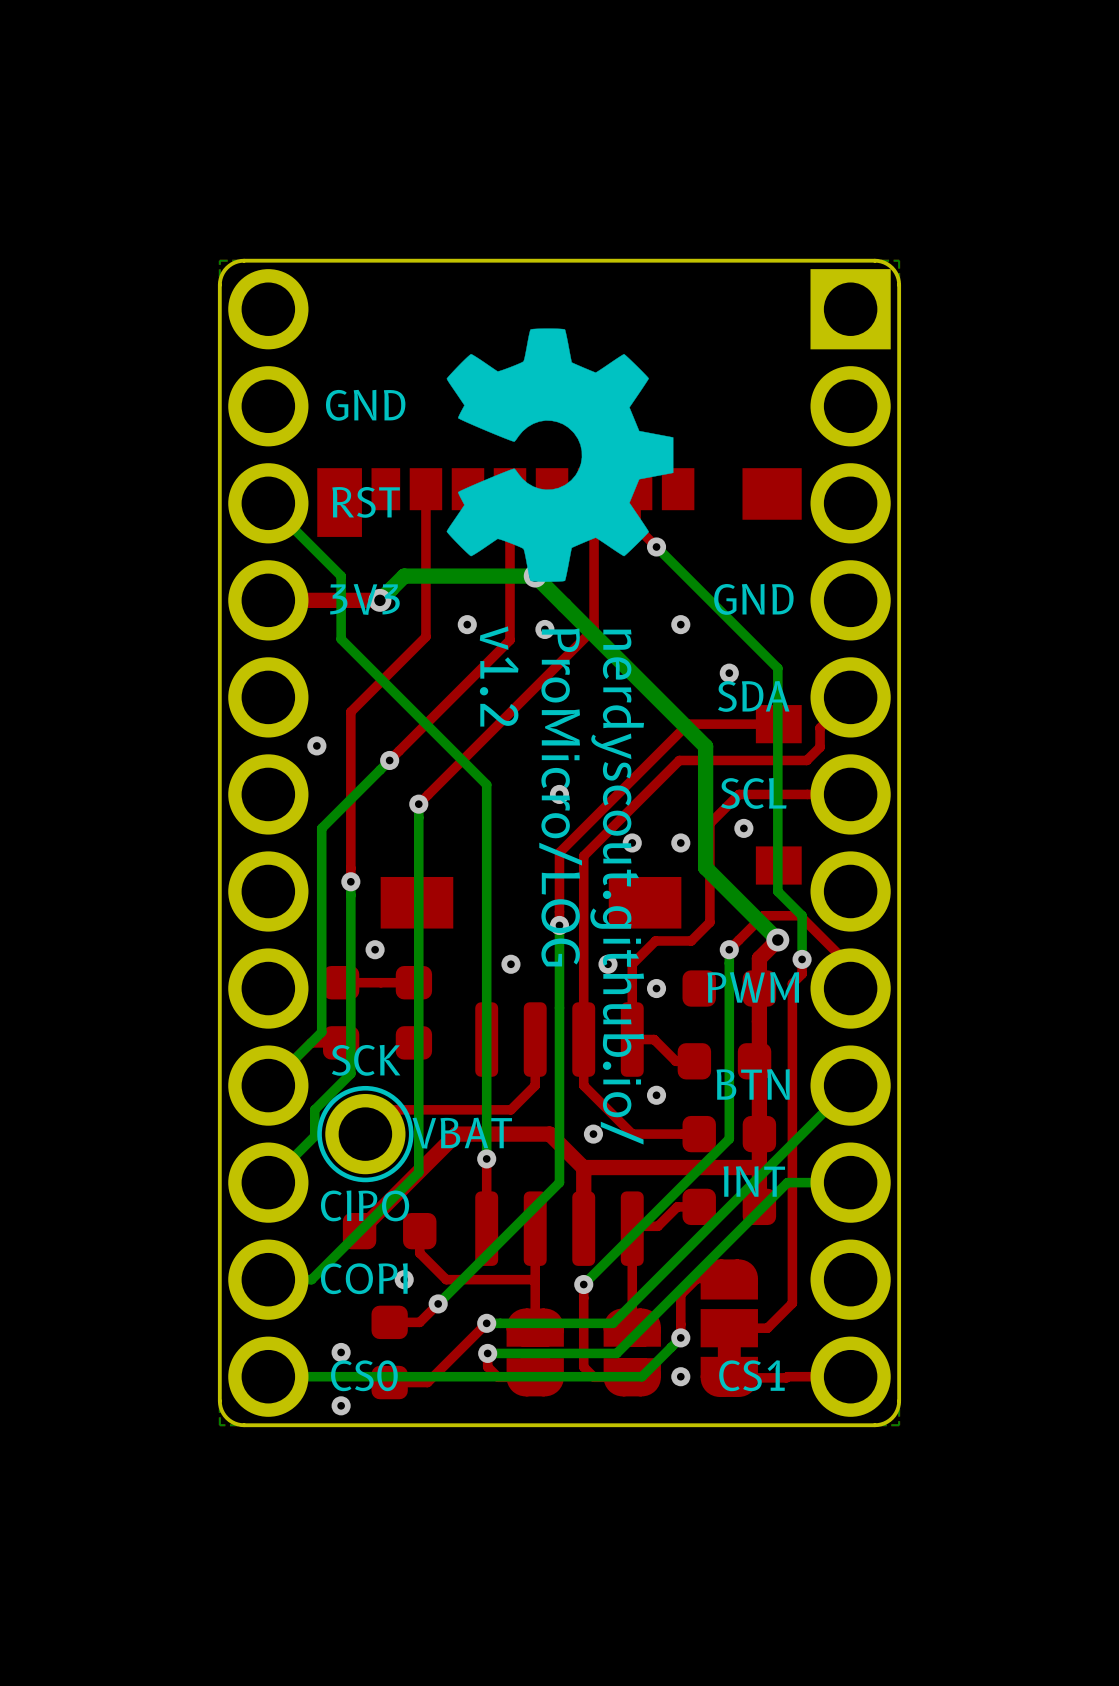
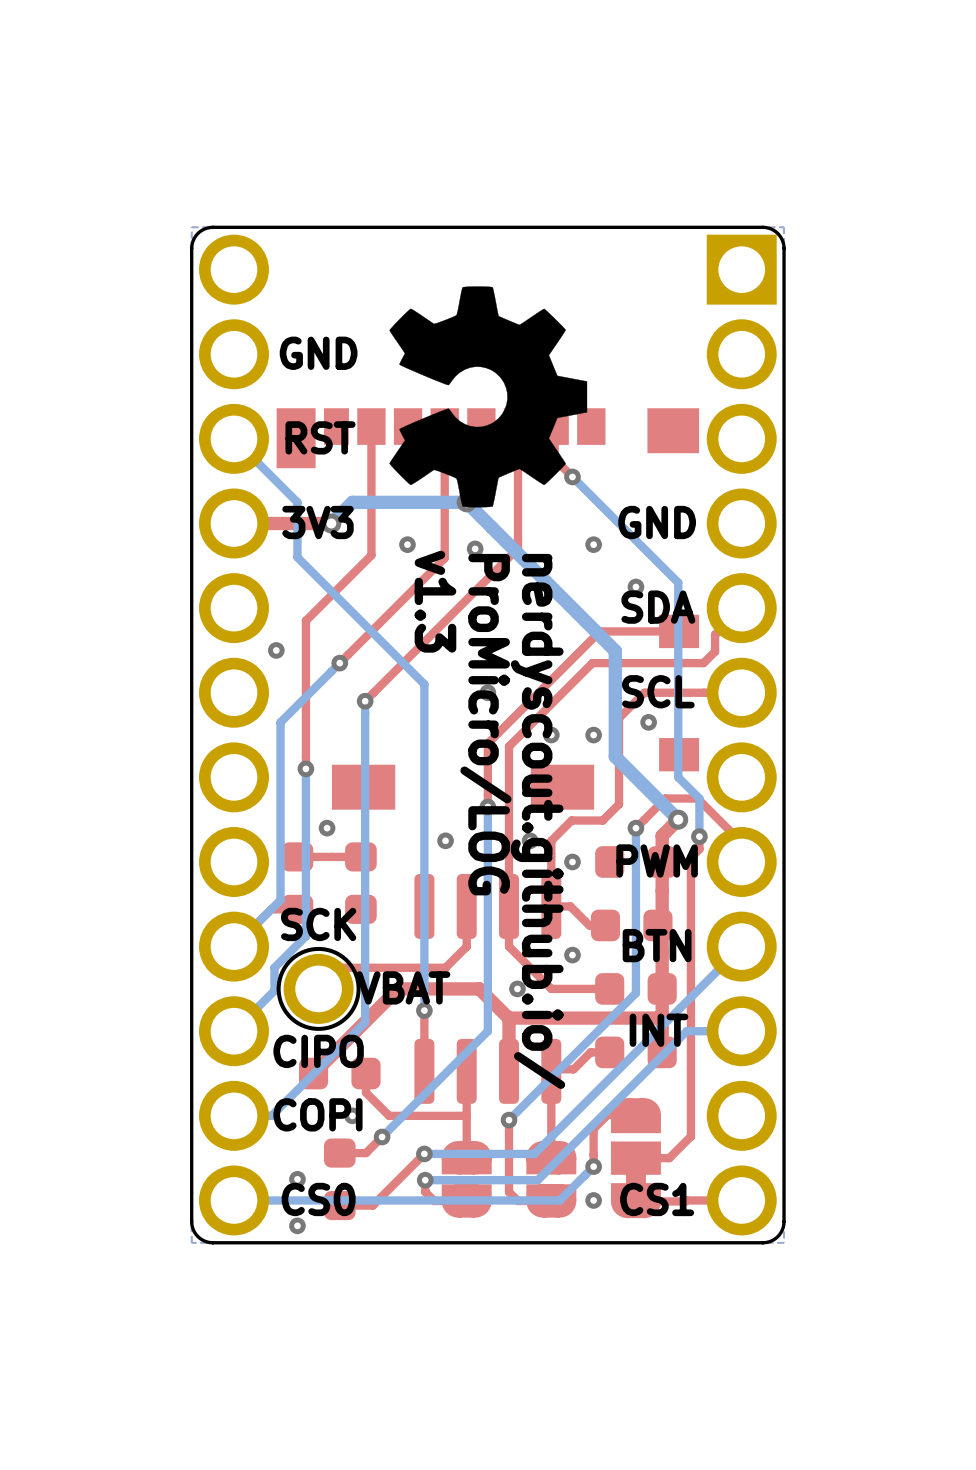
text: v1.2 (499, 676) -> v1.3 (435, 601)

